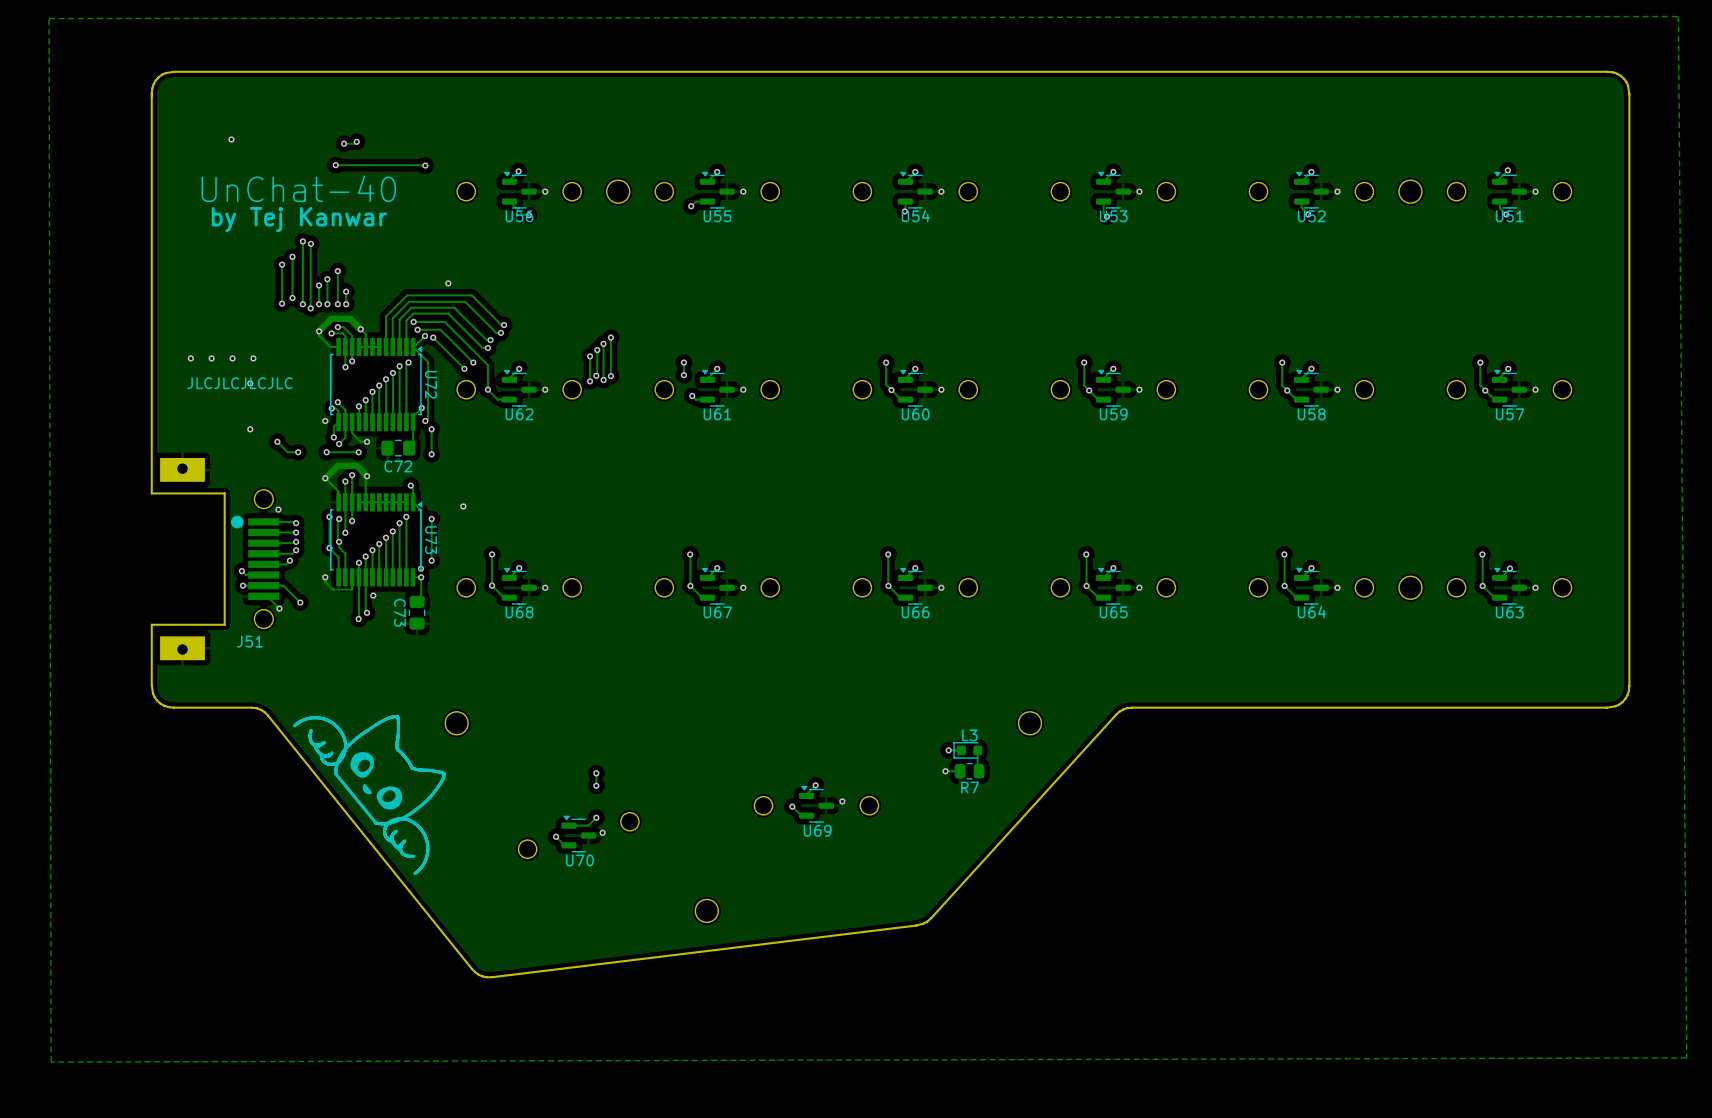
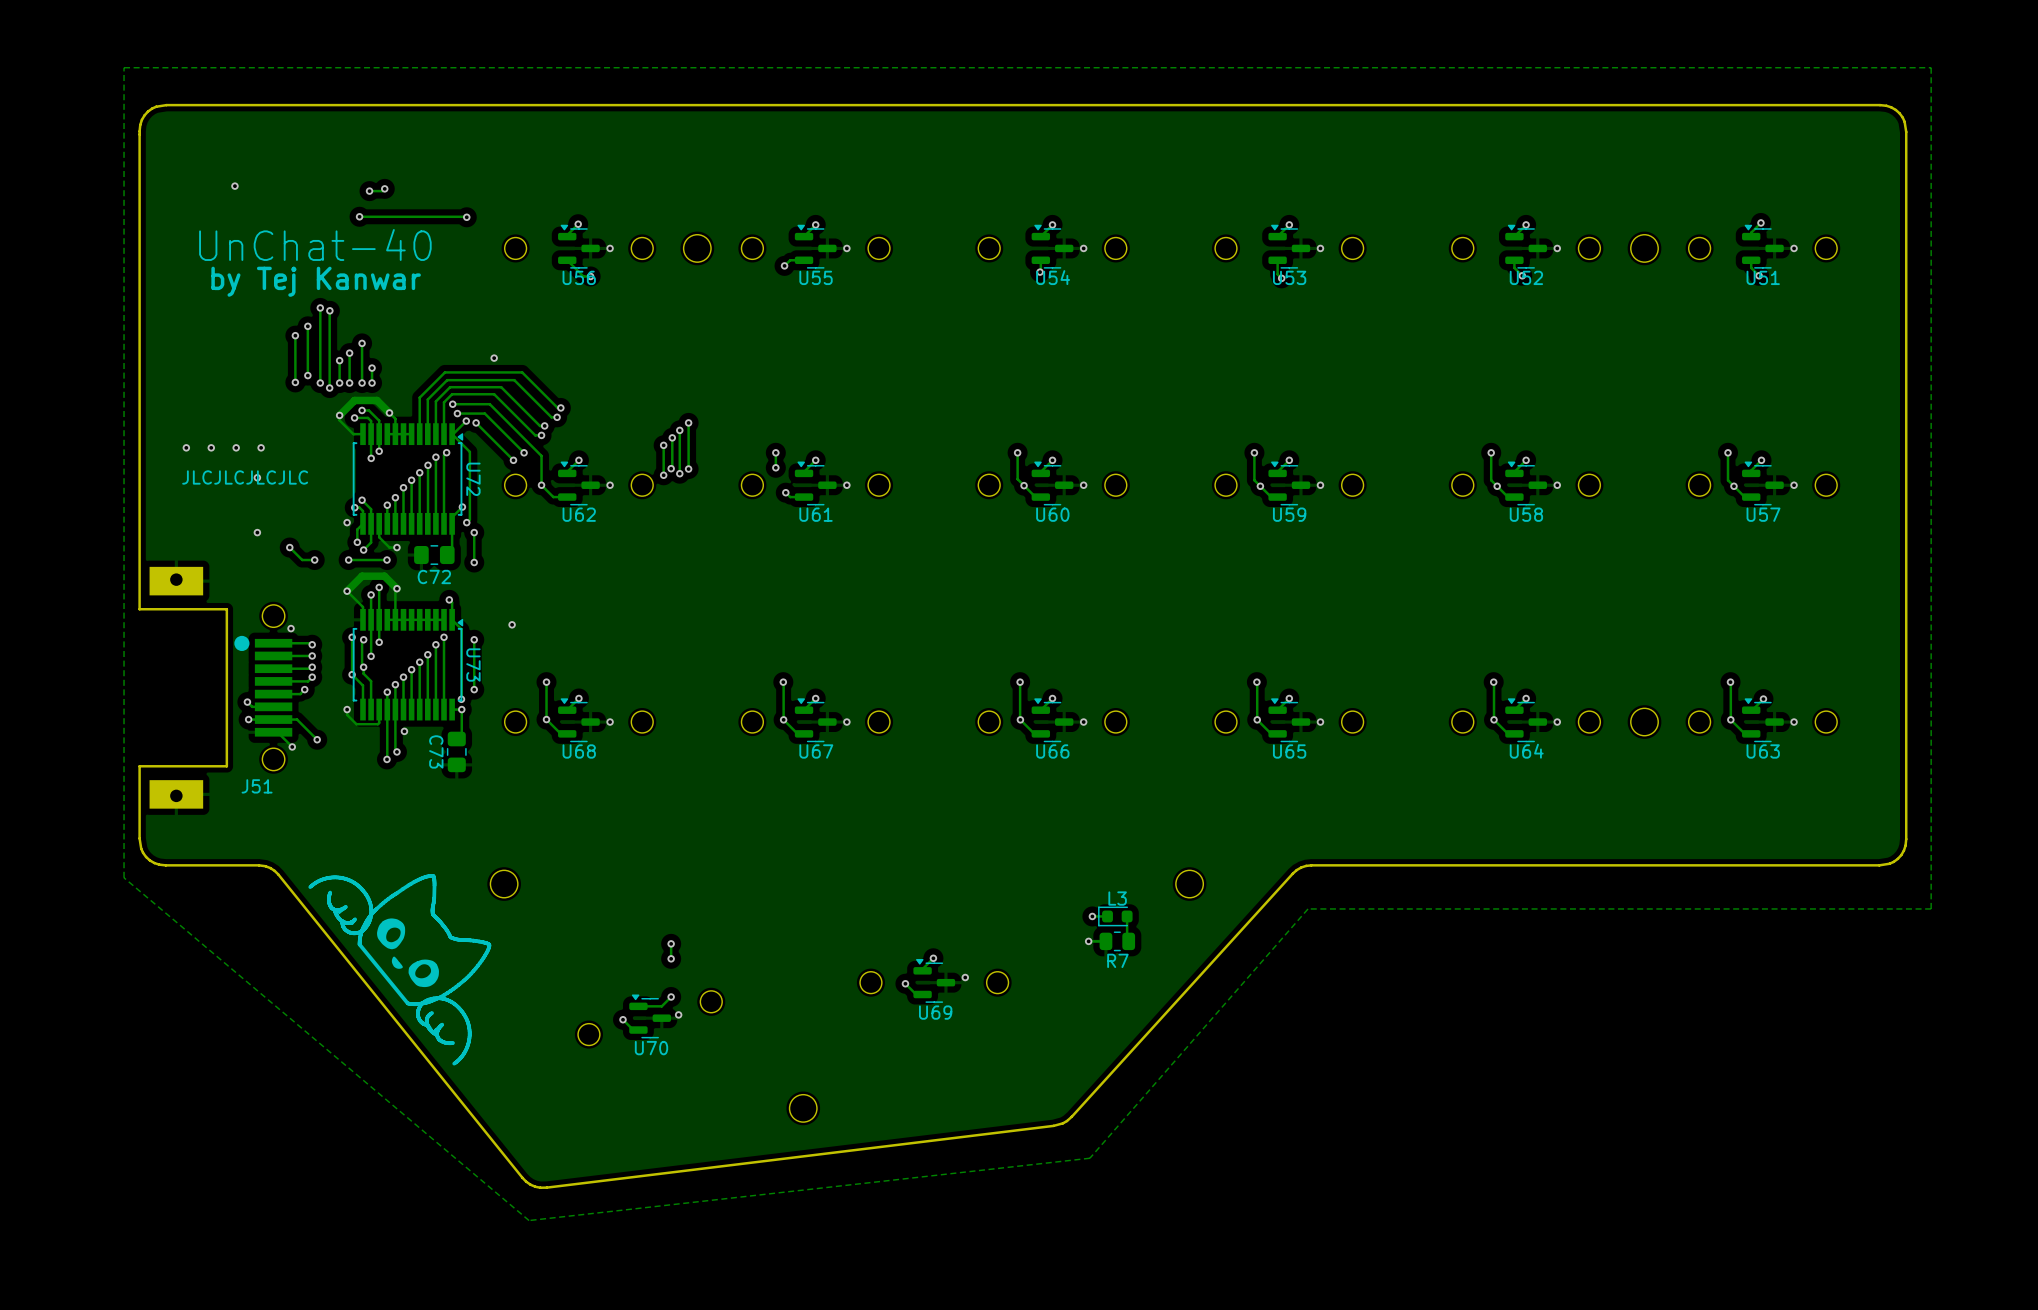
zone outline: (1678, 16) (1686, 1057) (51, 1062) (49, 18) (1678, 16) -> (1931, 67) (1931, 908) (1308, 908) (1089, 1158) (529, 1220) (124, 877) (124, 67) (1931, 67)

